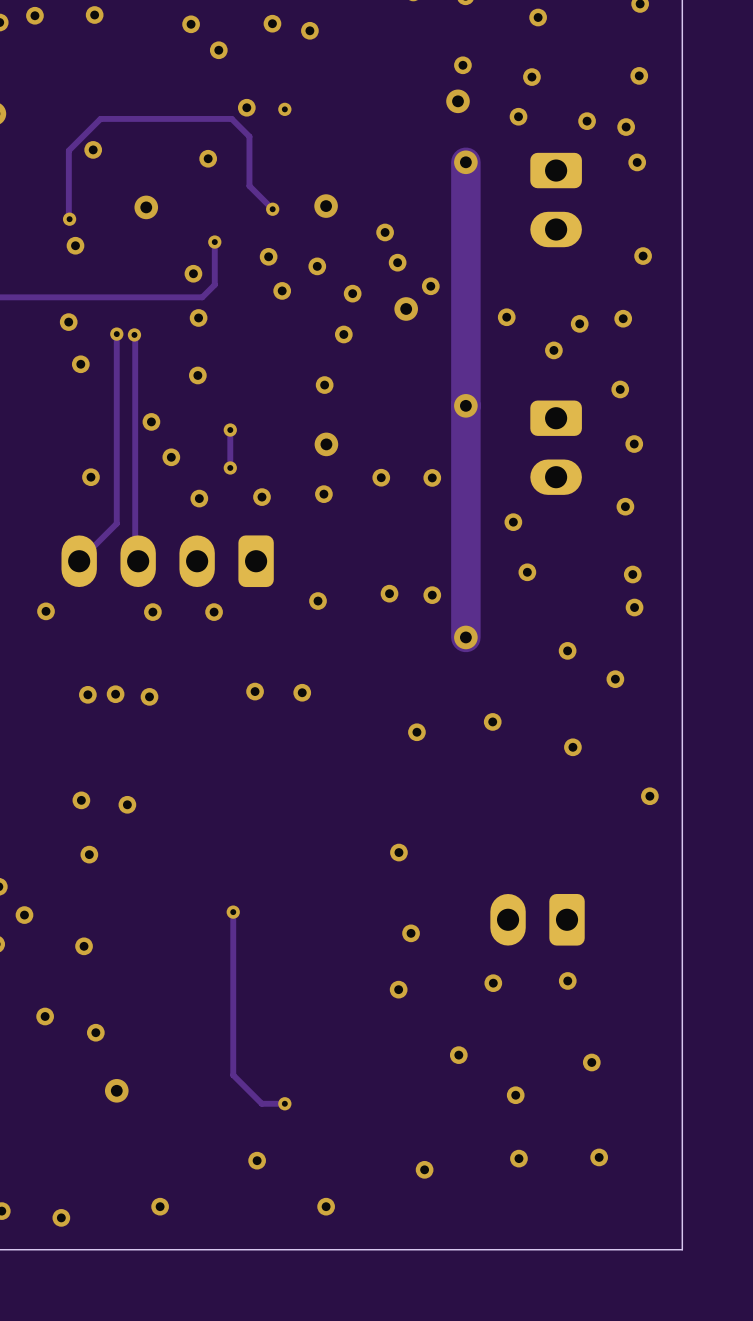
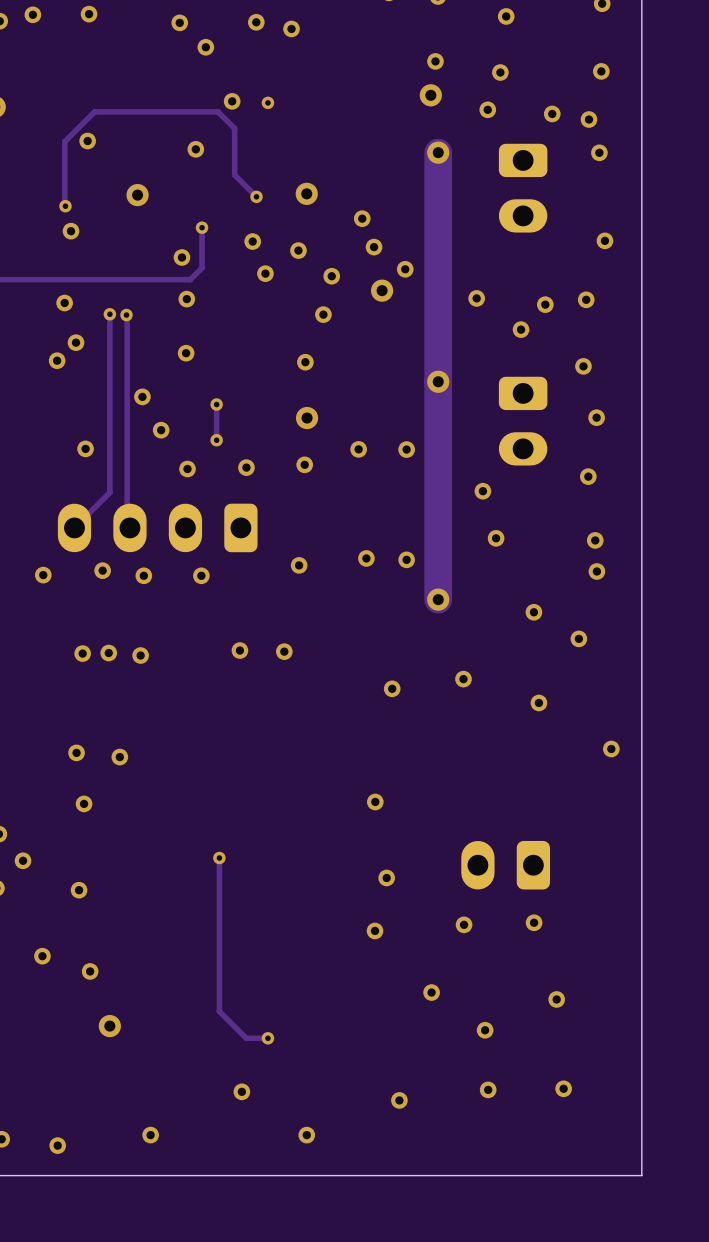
via: none -> (57, 360)
via: none -> (102, 570)

